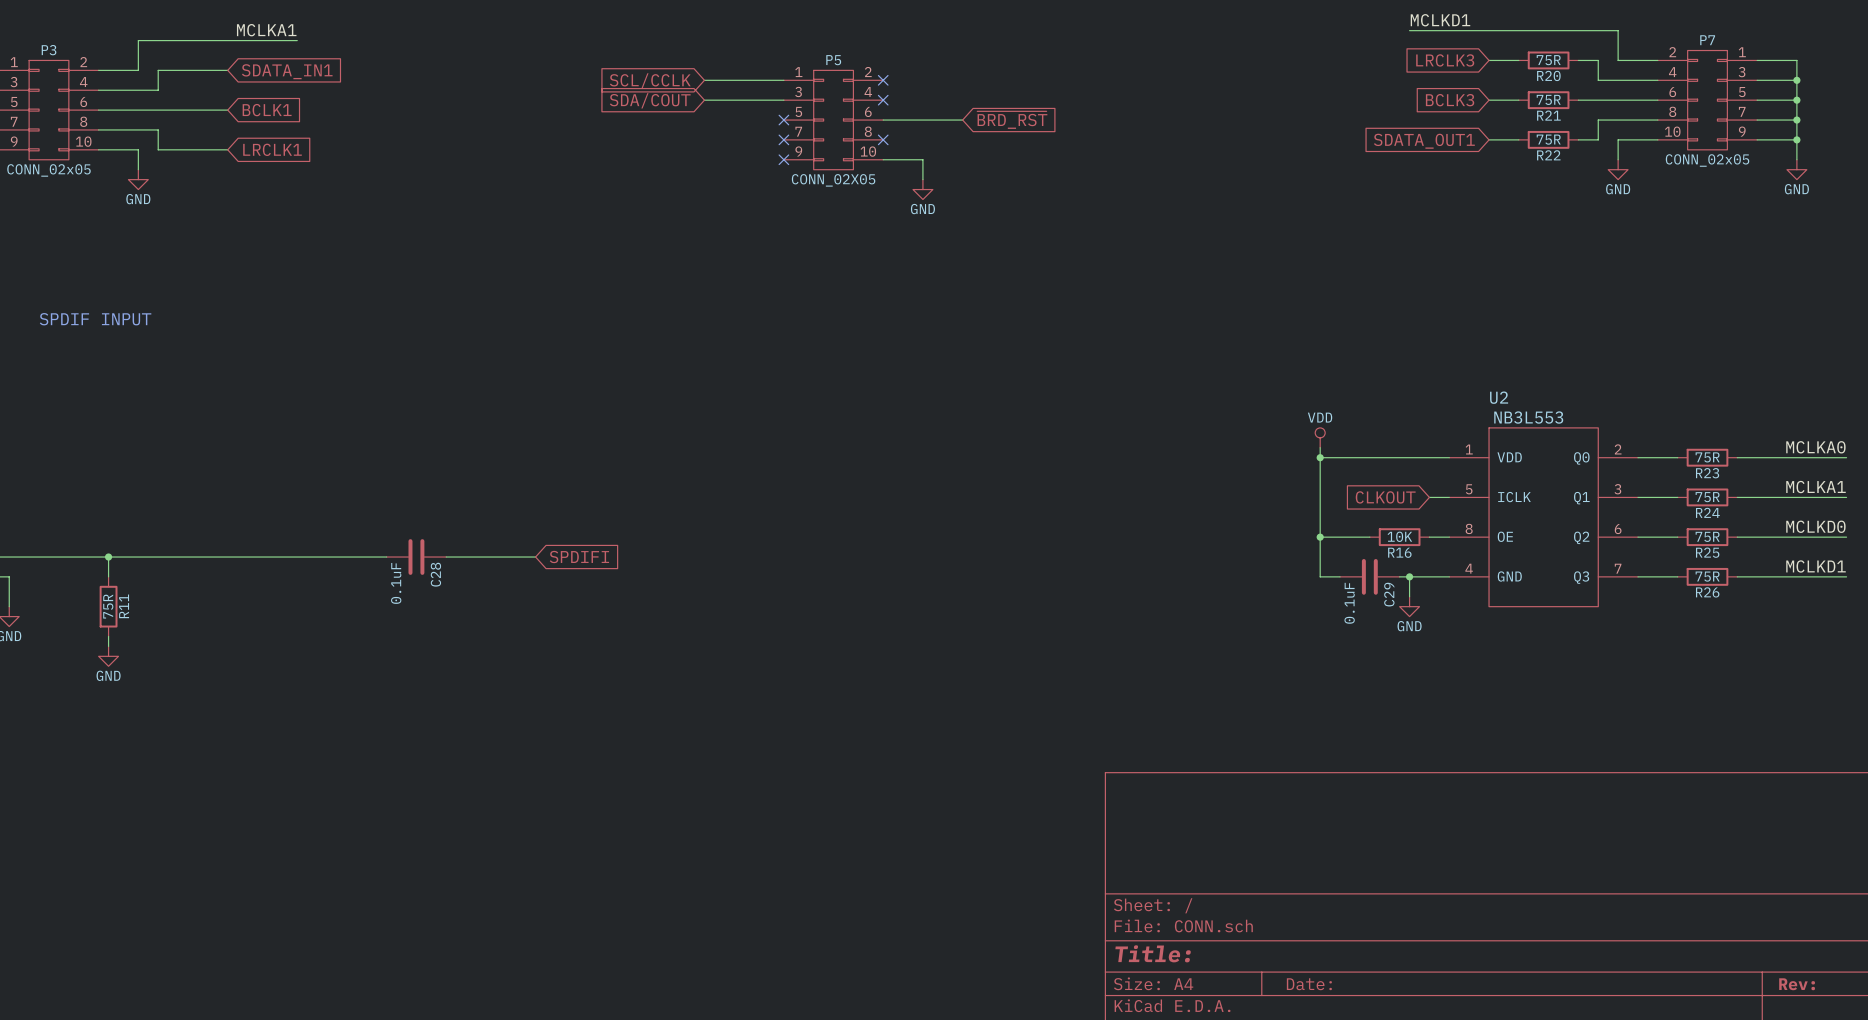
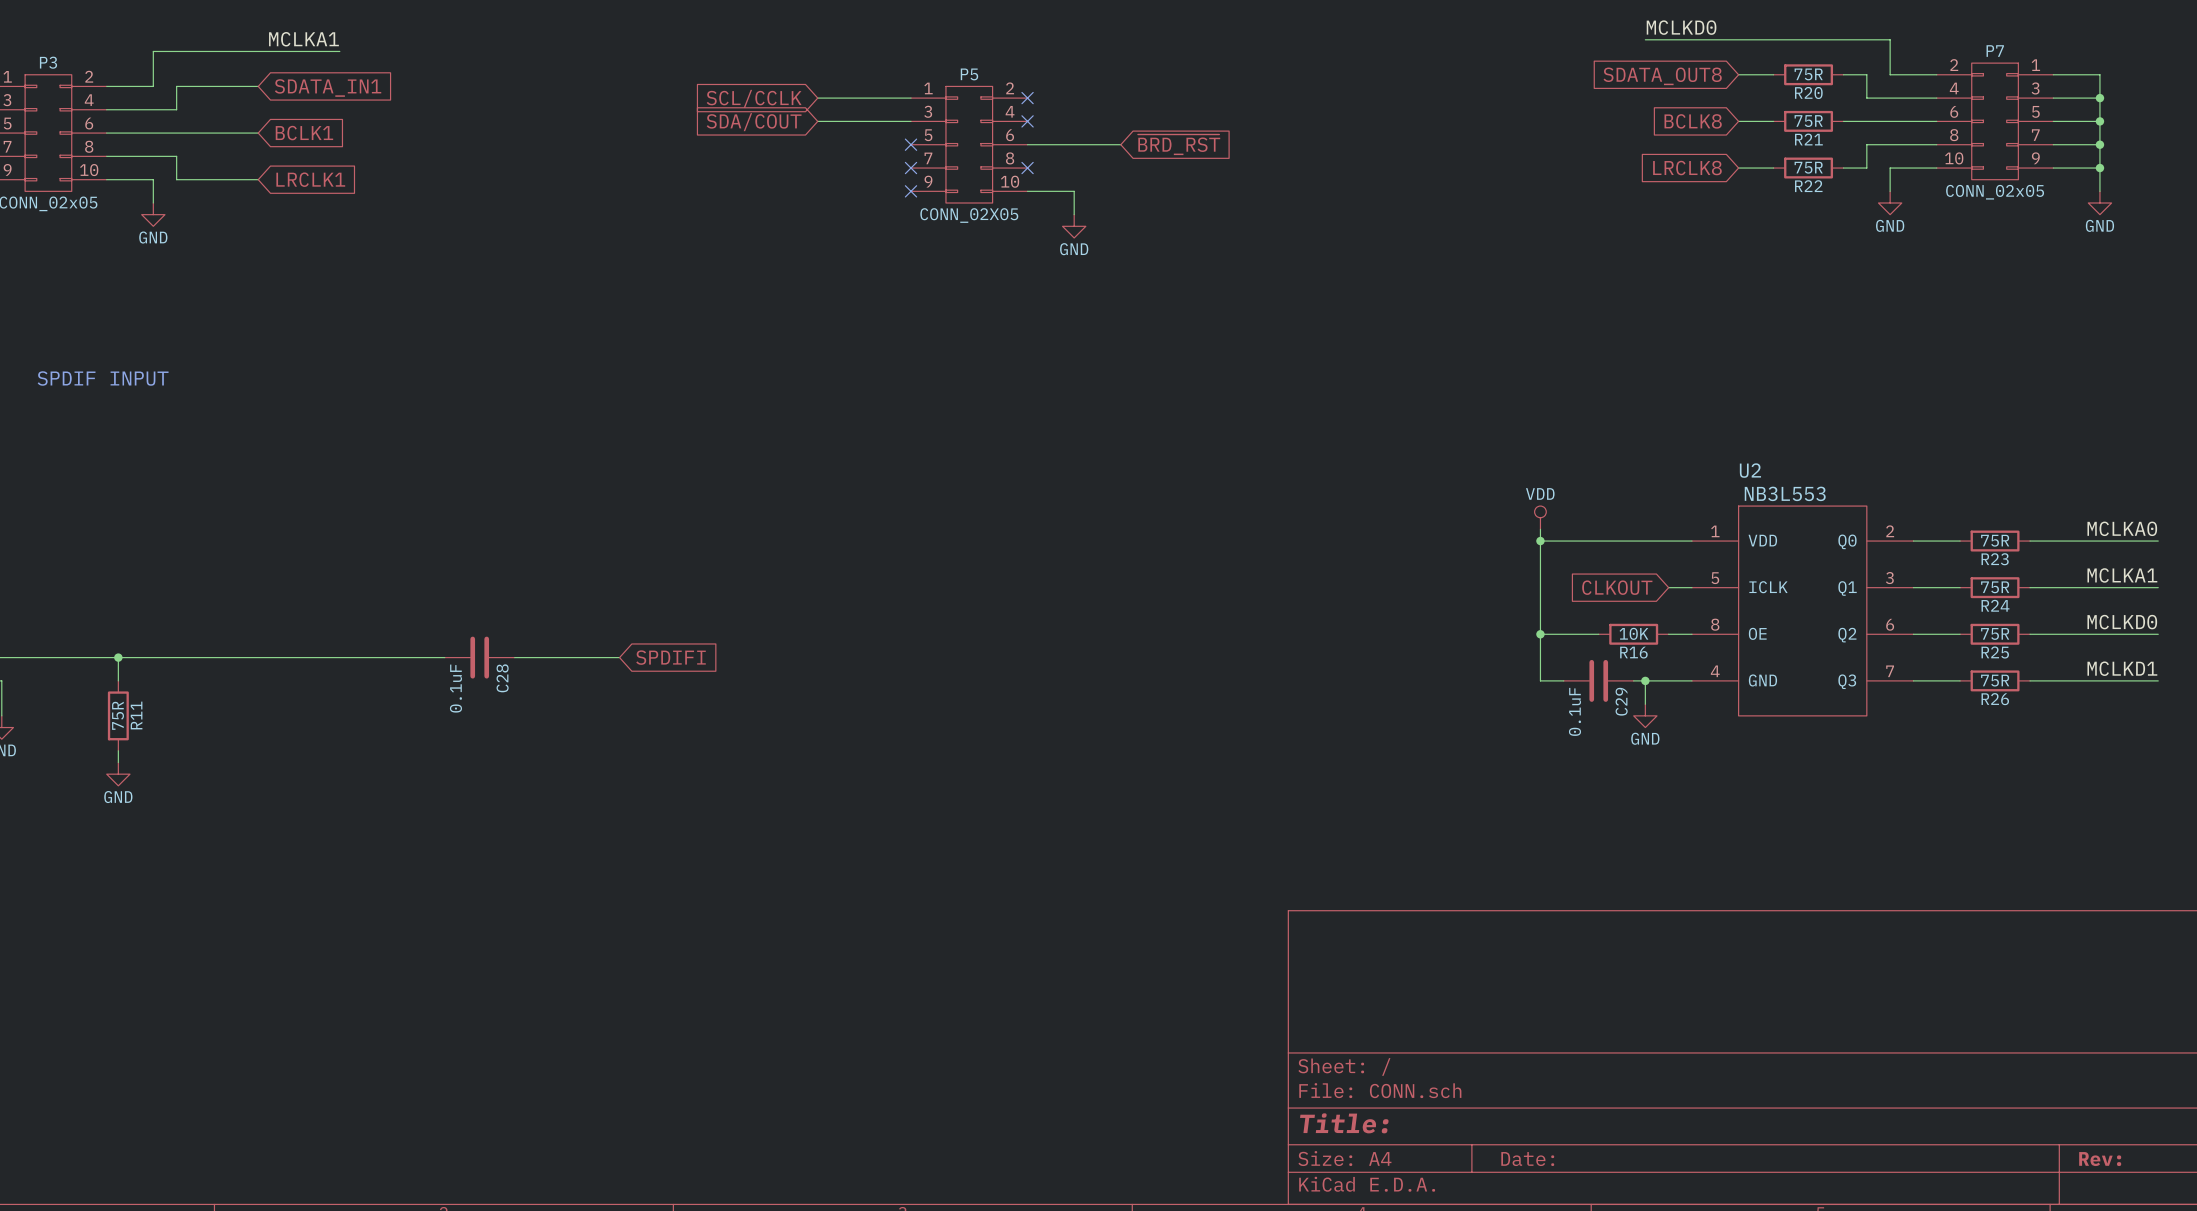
label: MCLKD1 (1440, 20) -> MCLKD0 (1681, 27)
global label: LRCLK3 (1445, 60) -> SDATA_OUT8 (1662, 76)
global label: BCLK3 (1450, 100) -> BCLK8 (1693, 121)
global label: SDATA_OUT1 (1424, 141) -> LRCLK8 (1687, 168)

